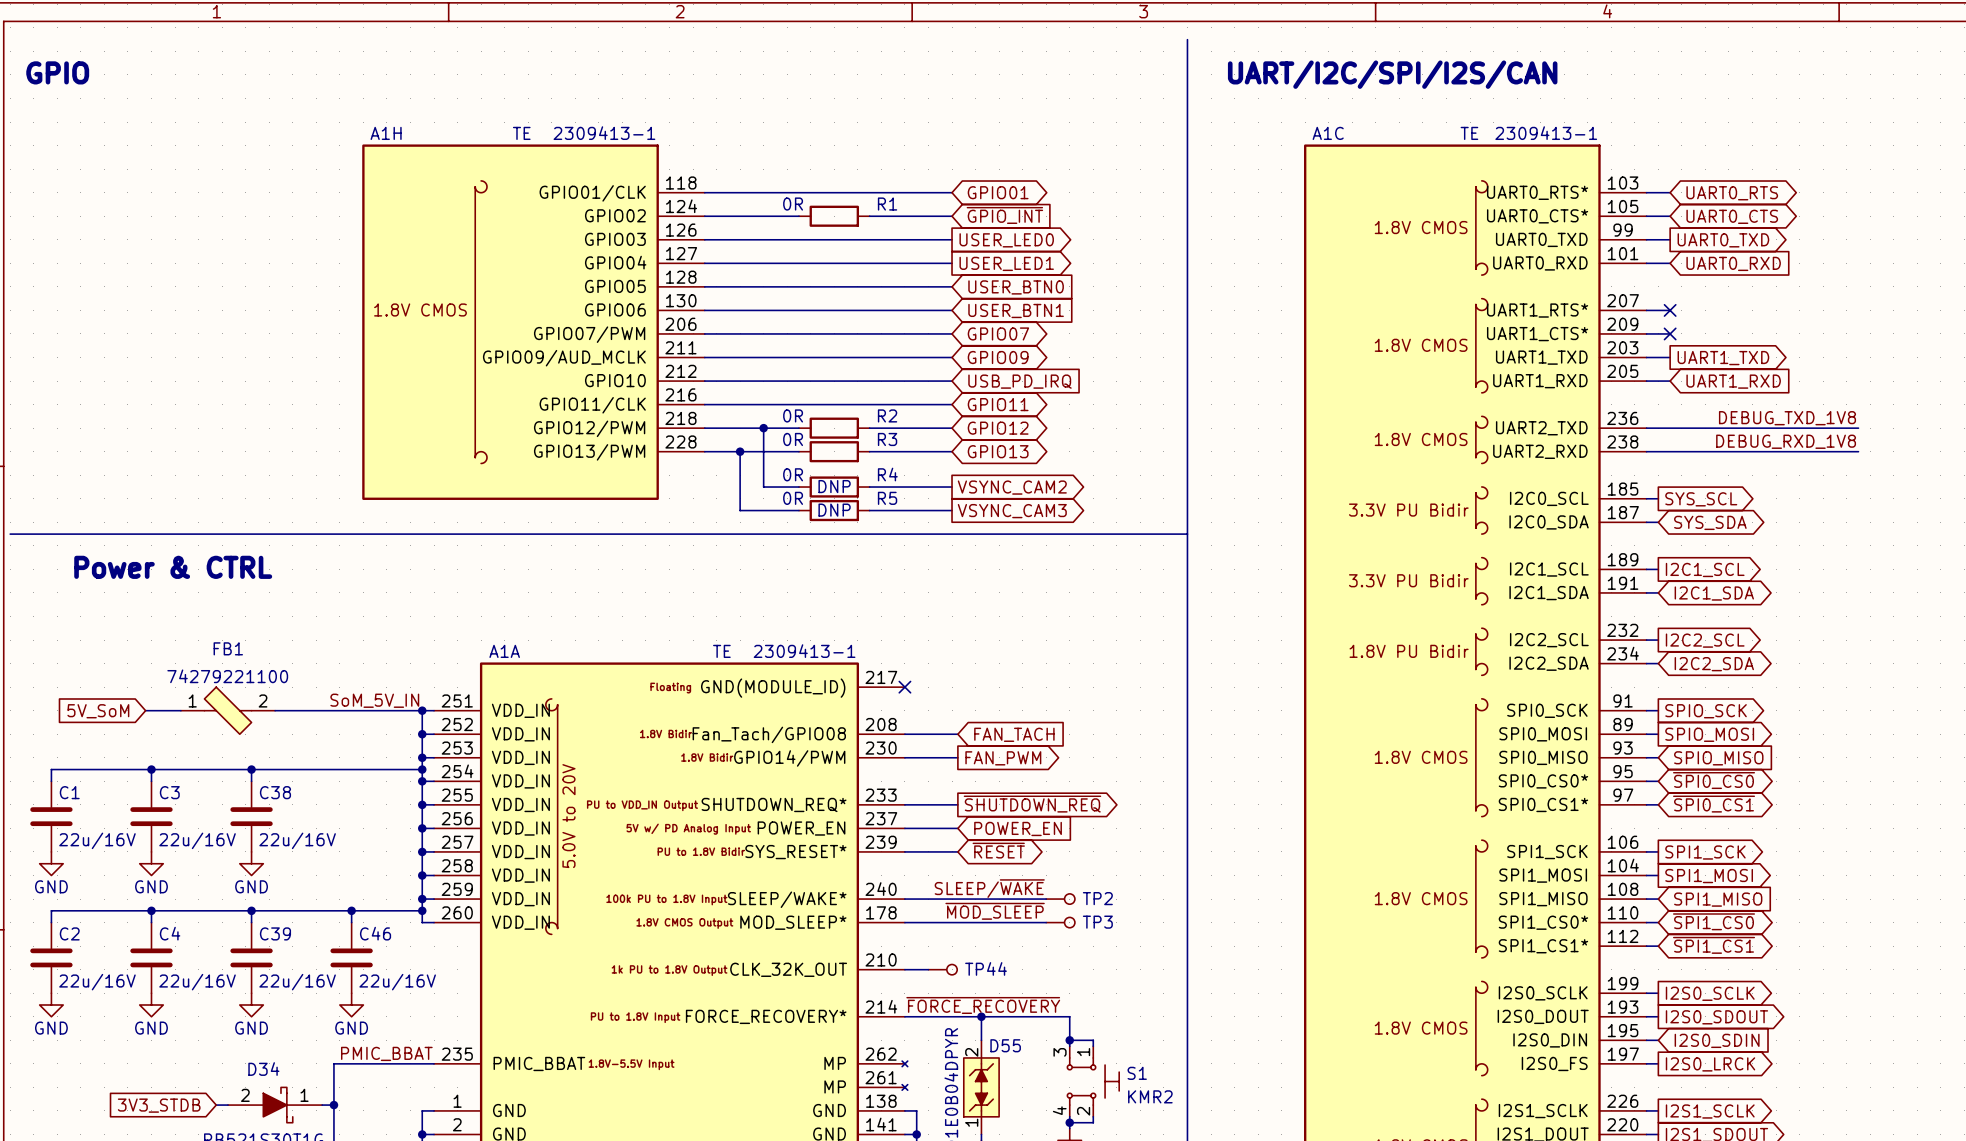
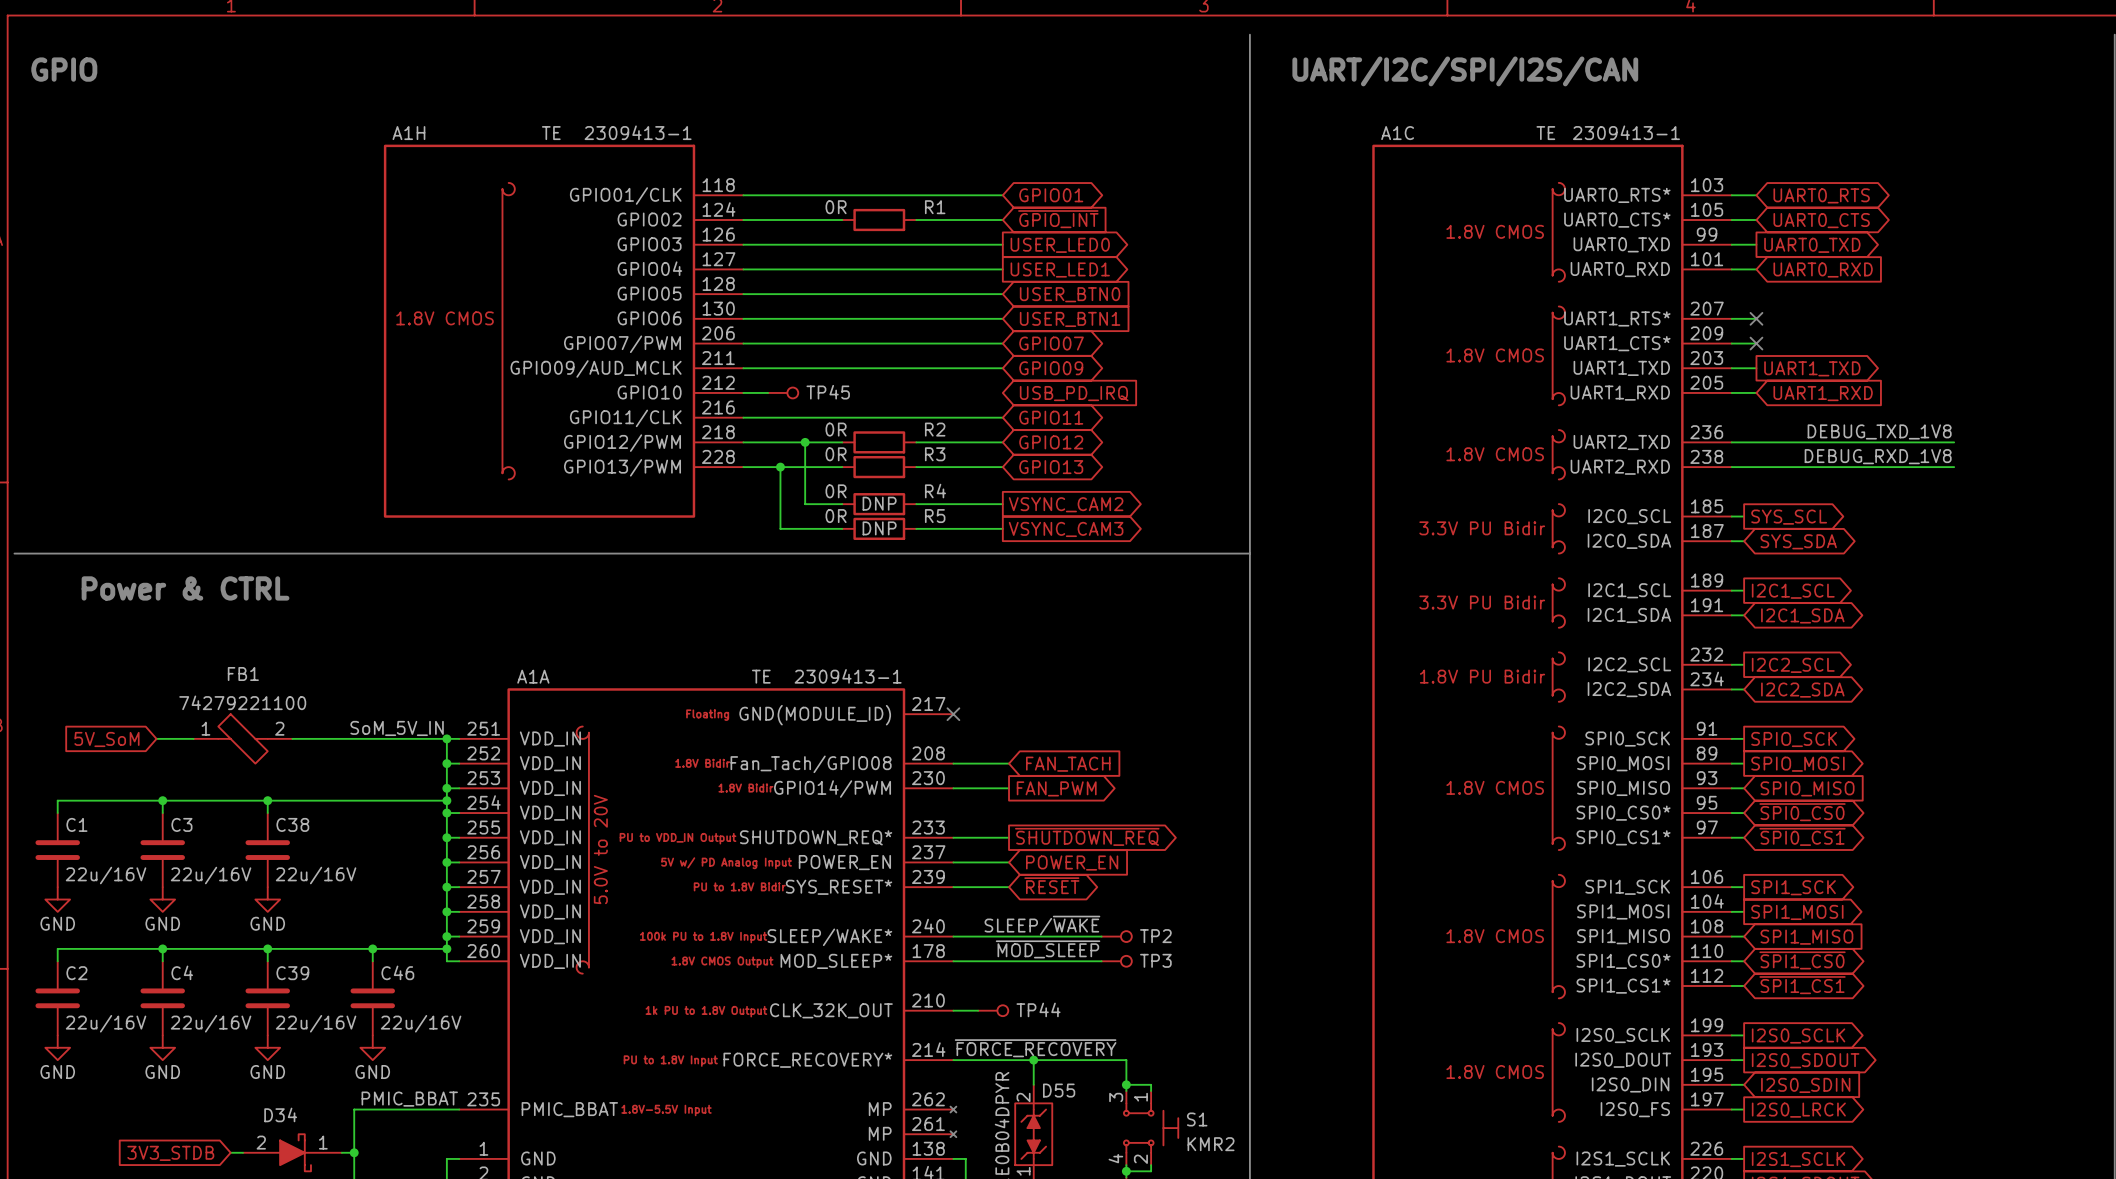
wire: (728, 381) (952, 381) -> none
TP45: none -> (783, 392)

